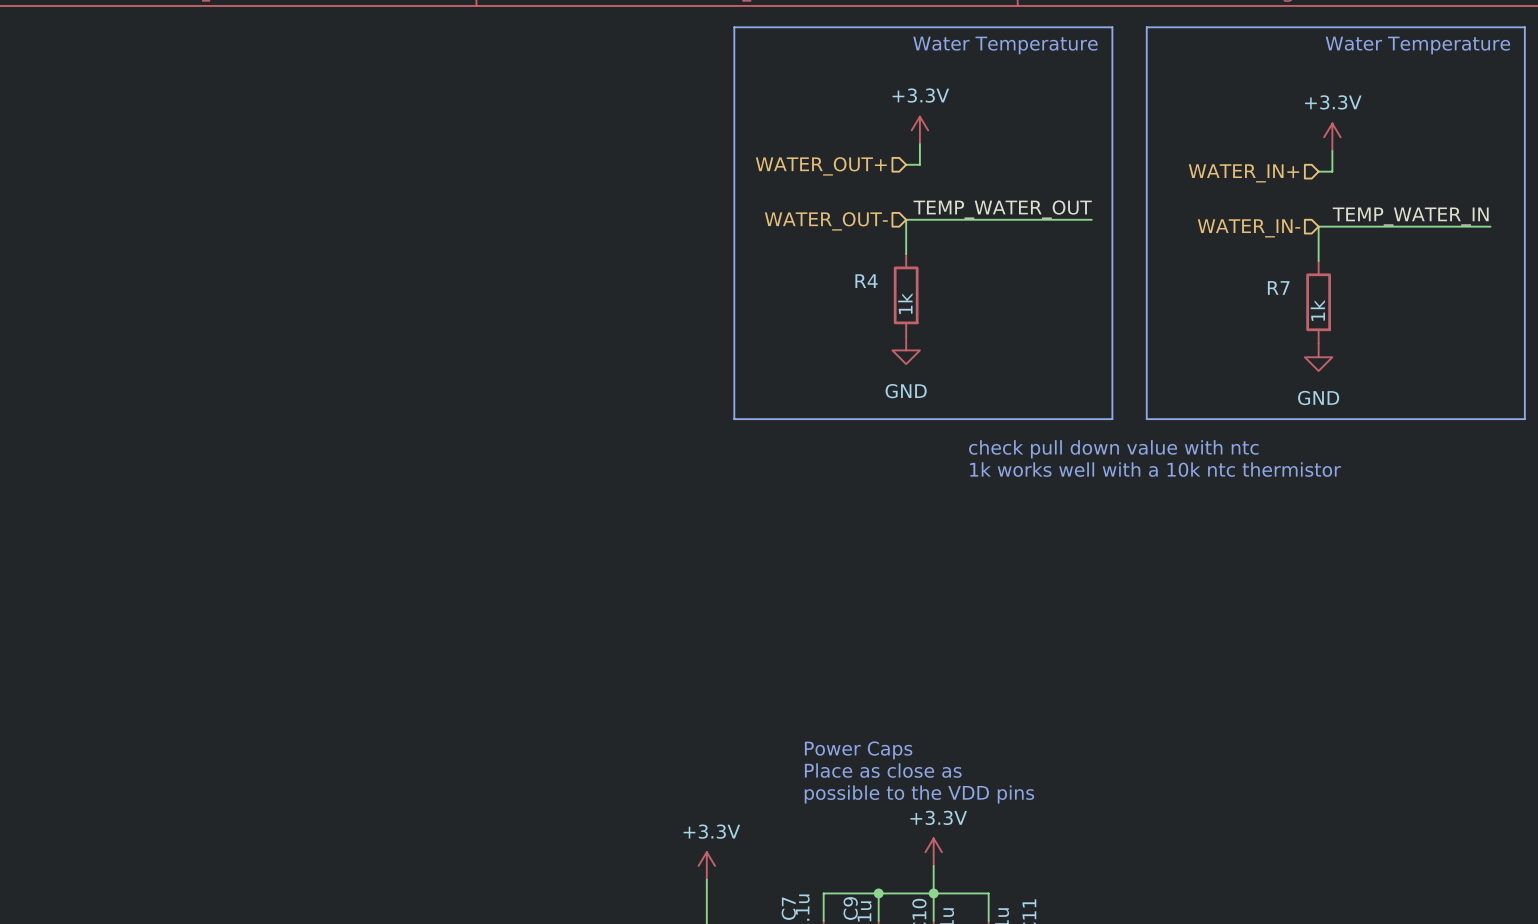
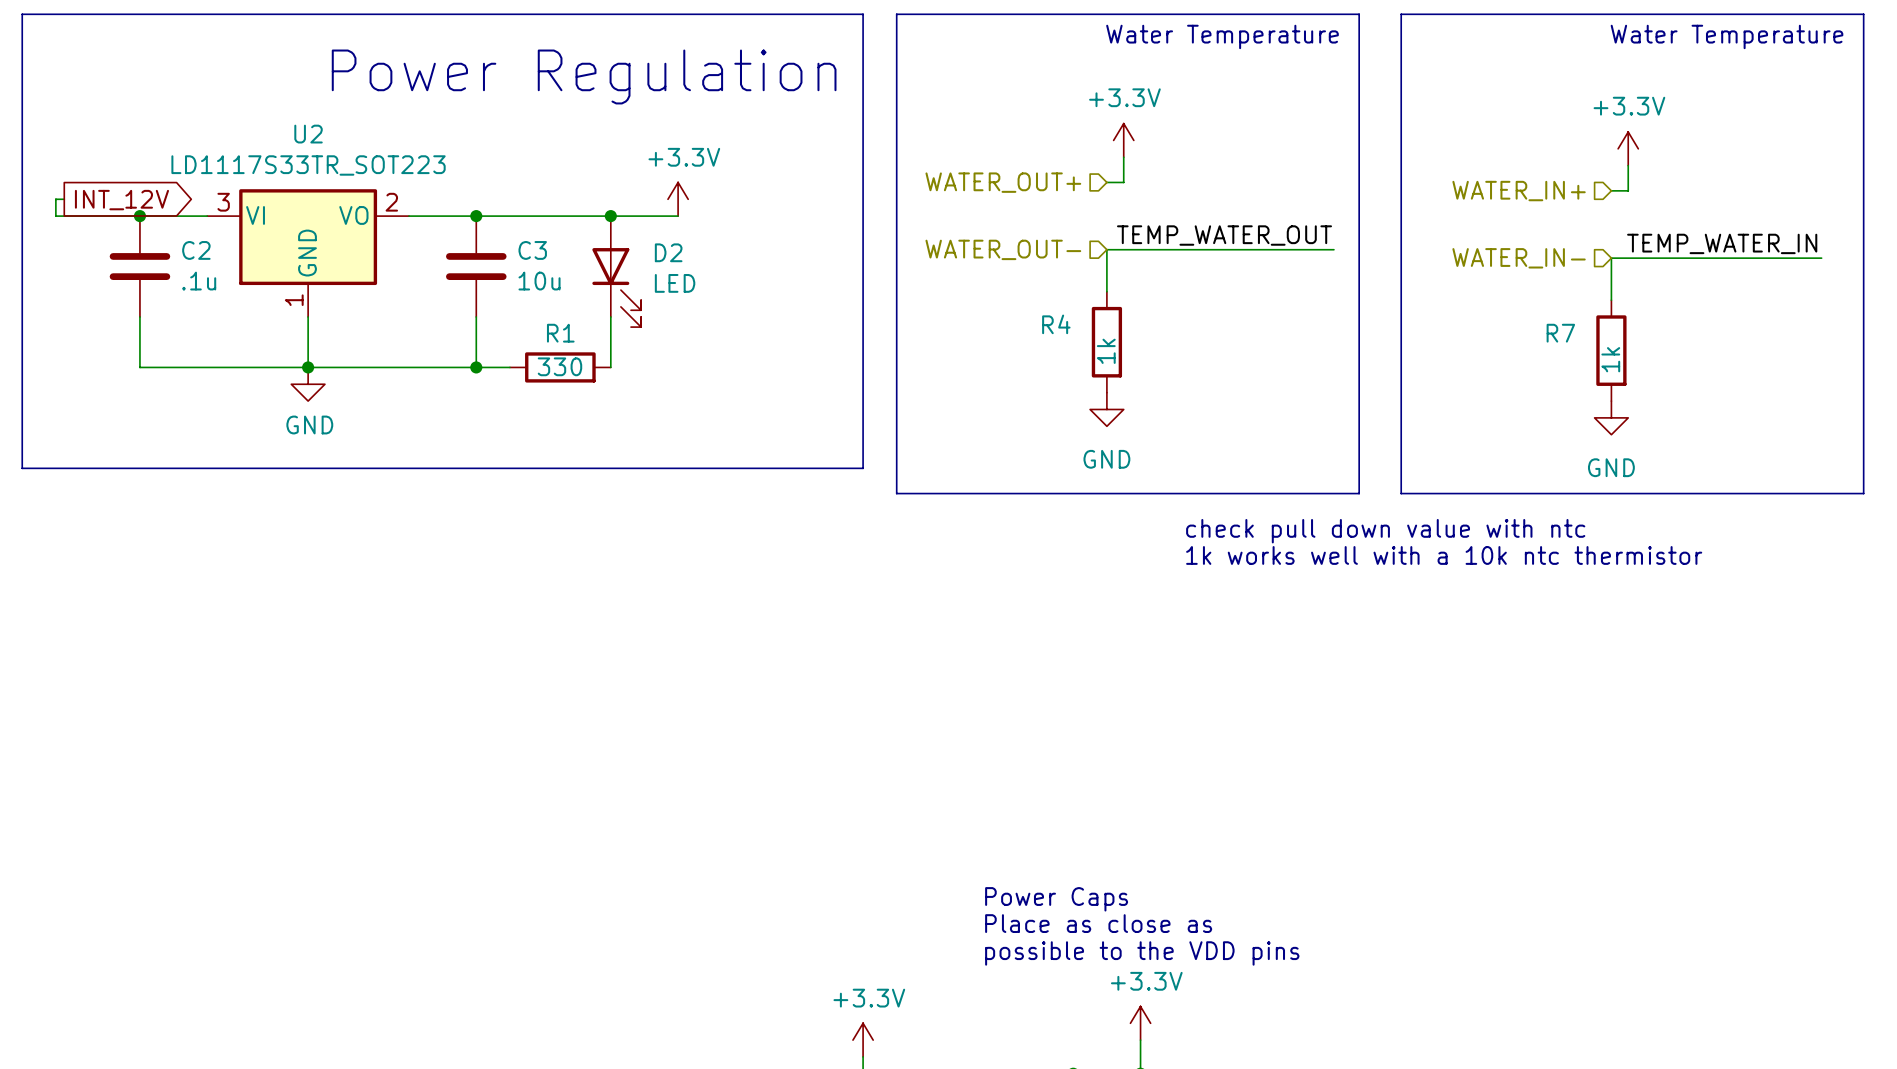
line: none -> (22, 14) (22, 468) (863, 468) (863, 14) (22, 14)
text: none -> Power Regulation (584, 76)
wire: none -> (64, 199) (55, 199) (55, 216) (207, 216)
power symbol: none -> +3.3V (678, 199)
global label: none -> INT_12V (121, 200)
junction: none -> (139, 216)
wire: none -> (409, 216) (678, 216)
junction: none -> (476, 216)
junction: none -> (610, 216)
U2: none -> LD1117S33TR_SOT223 (308, 253)
C2: none -> .1u (139, 266)
C3: none -> 10u (476, 266)
D2: none -> LED (616, 271)
wire: none -> (139, 316) (139, 367) (509, 367)
wire: none -> (308, 316) (308, 367)
wire: none -> (476, 316) (476, 367)
wire: none -> (610, 316) (610, 367)
junction: none -> (308, 367)
junction: none -> (476, 367)
R1: none -> 330 (560, 367)
power symbol: none -> GND (308, 384)

